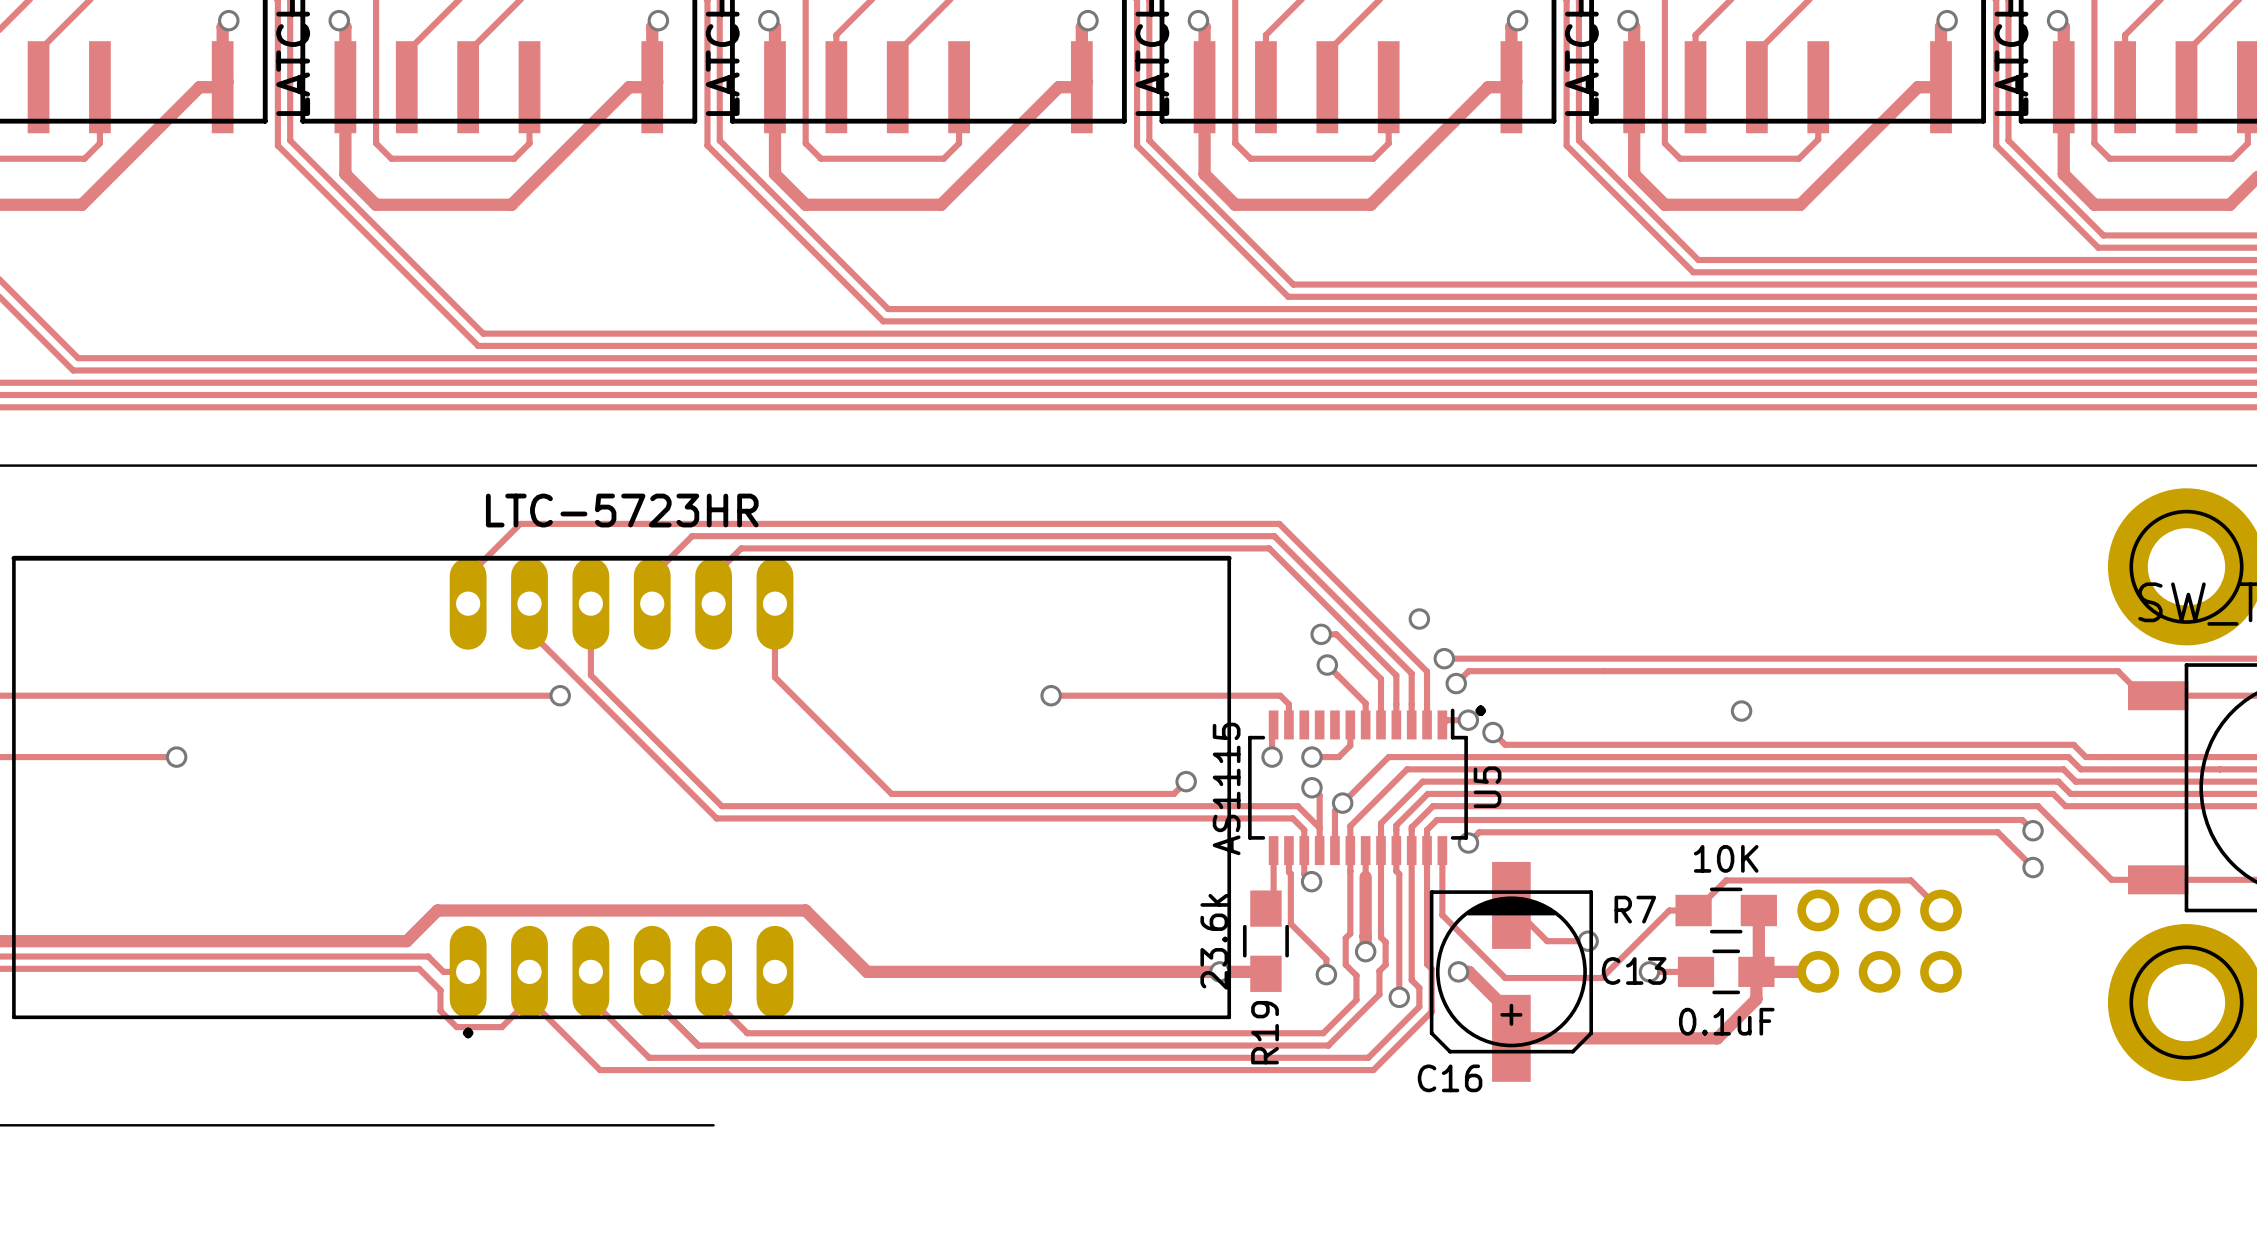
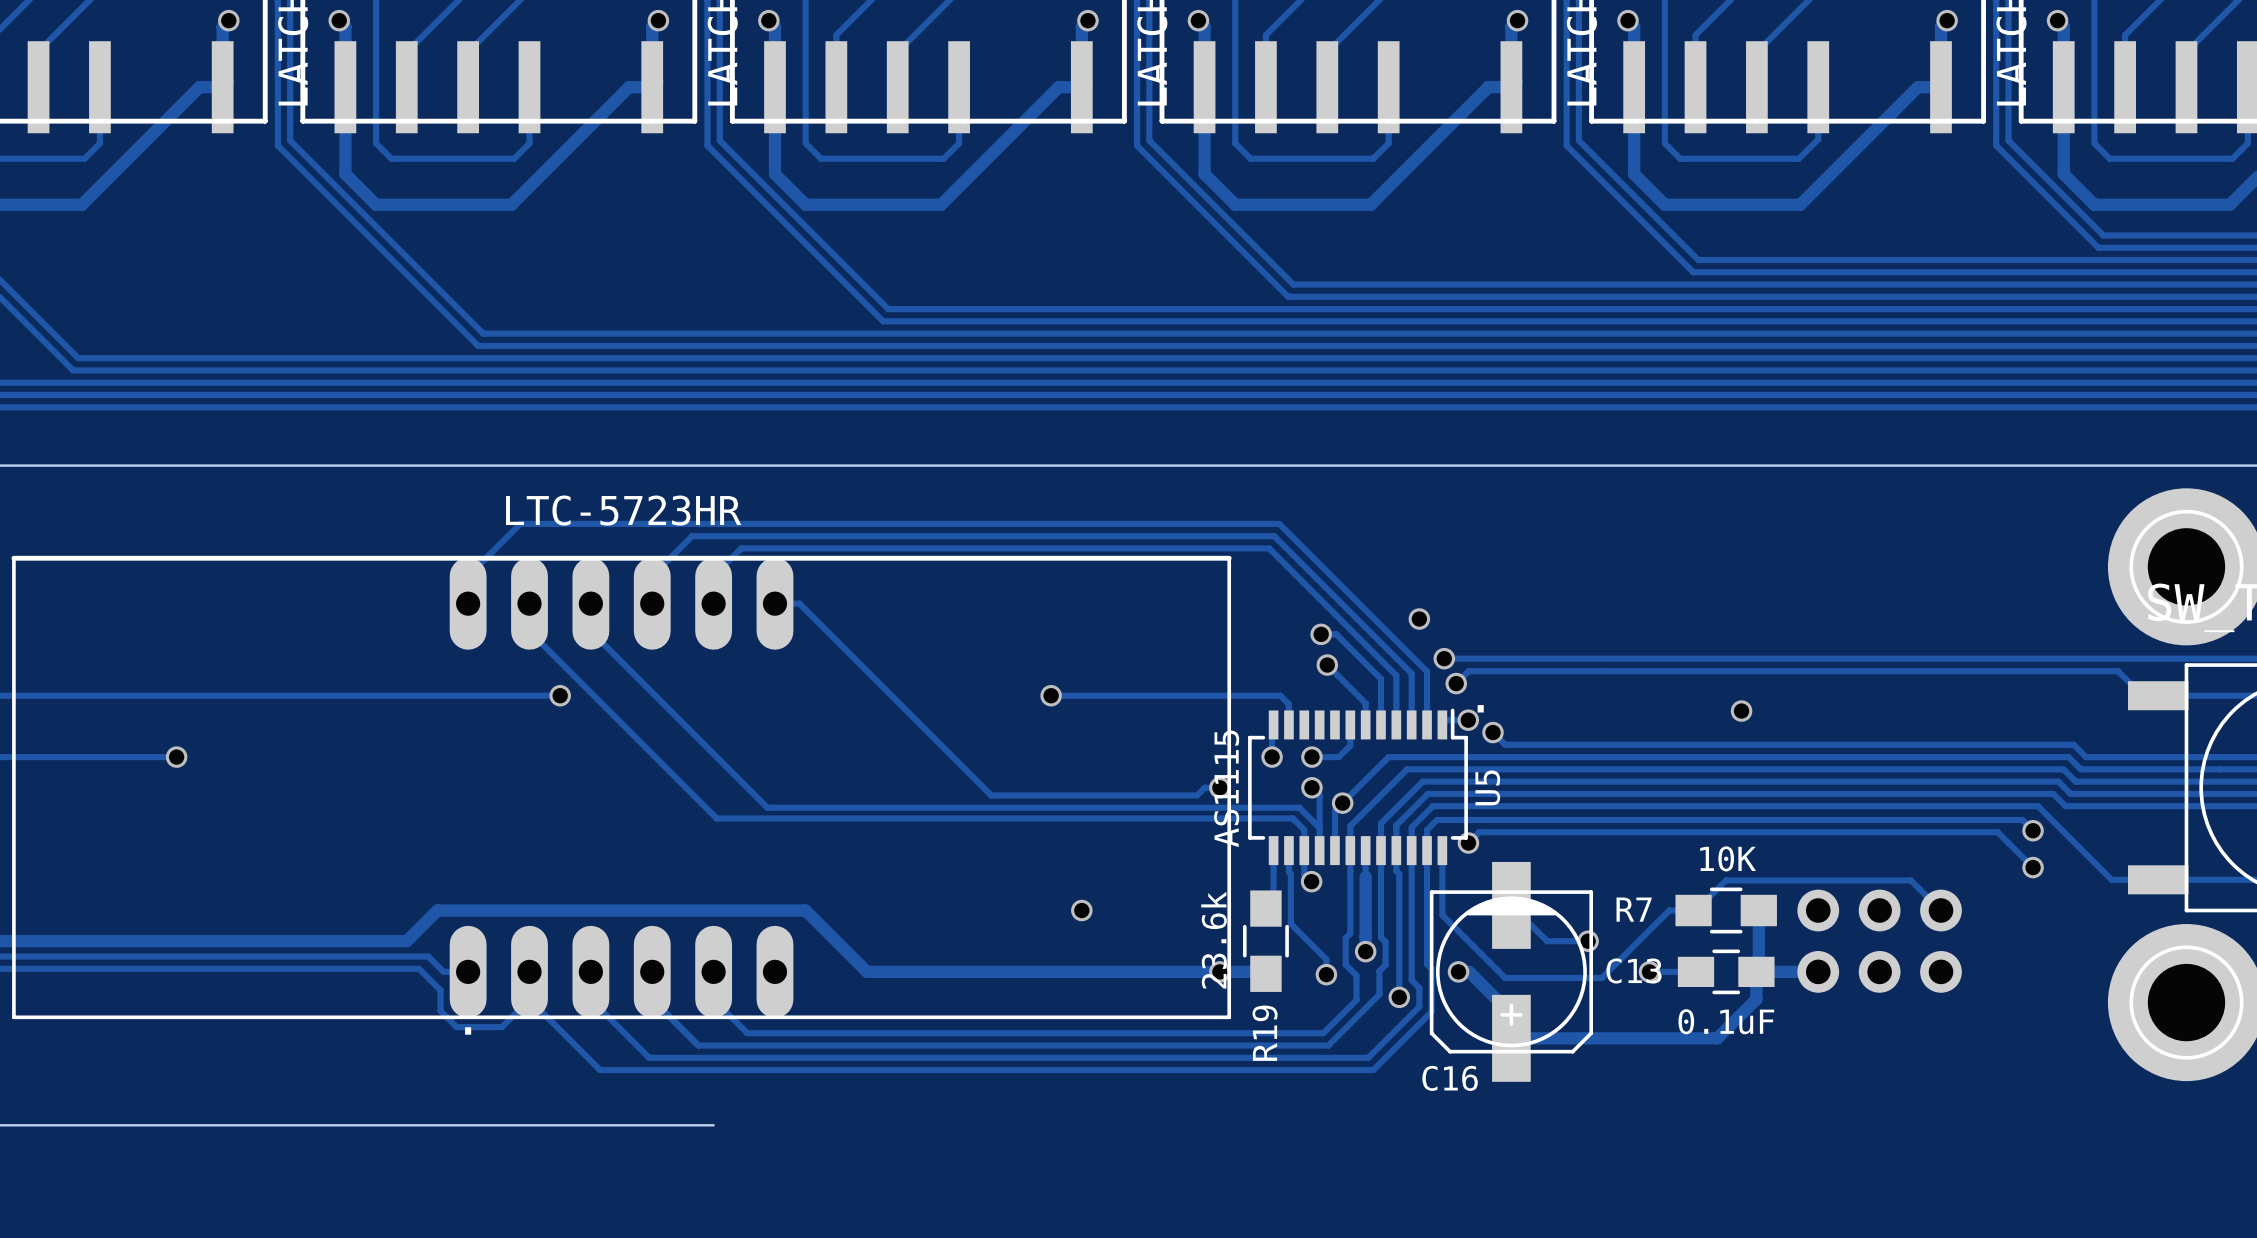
track: (774, 603) (774, 677) (891, 793) (1173, 793) (1186, 781) -> (774, 603) (799, 603) (991, 795) (1197, 795) (1204, 787) (1219, 787)
track: (590, 631) (590, 675) (721, 806) (1297, 806) (1299, 807) -> (590, 631) (767, 807) (1299, 807)
via position: (1186, 781) -> (1219, 787)
via: none -> (1081, 910)

